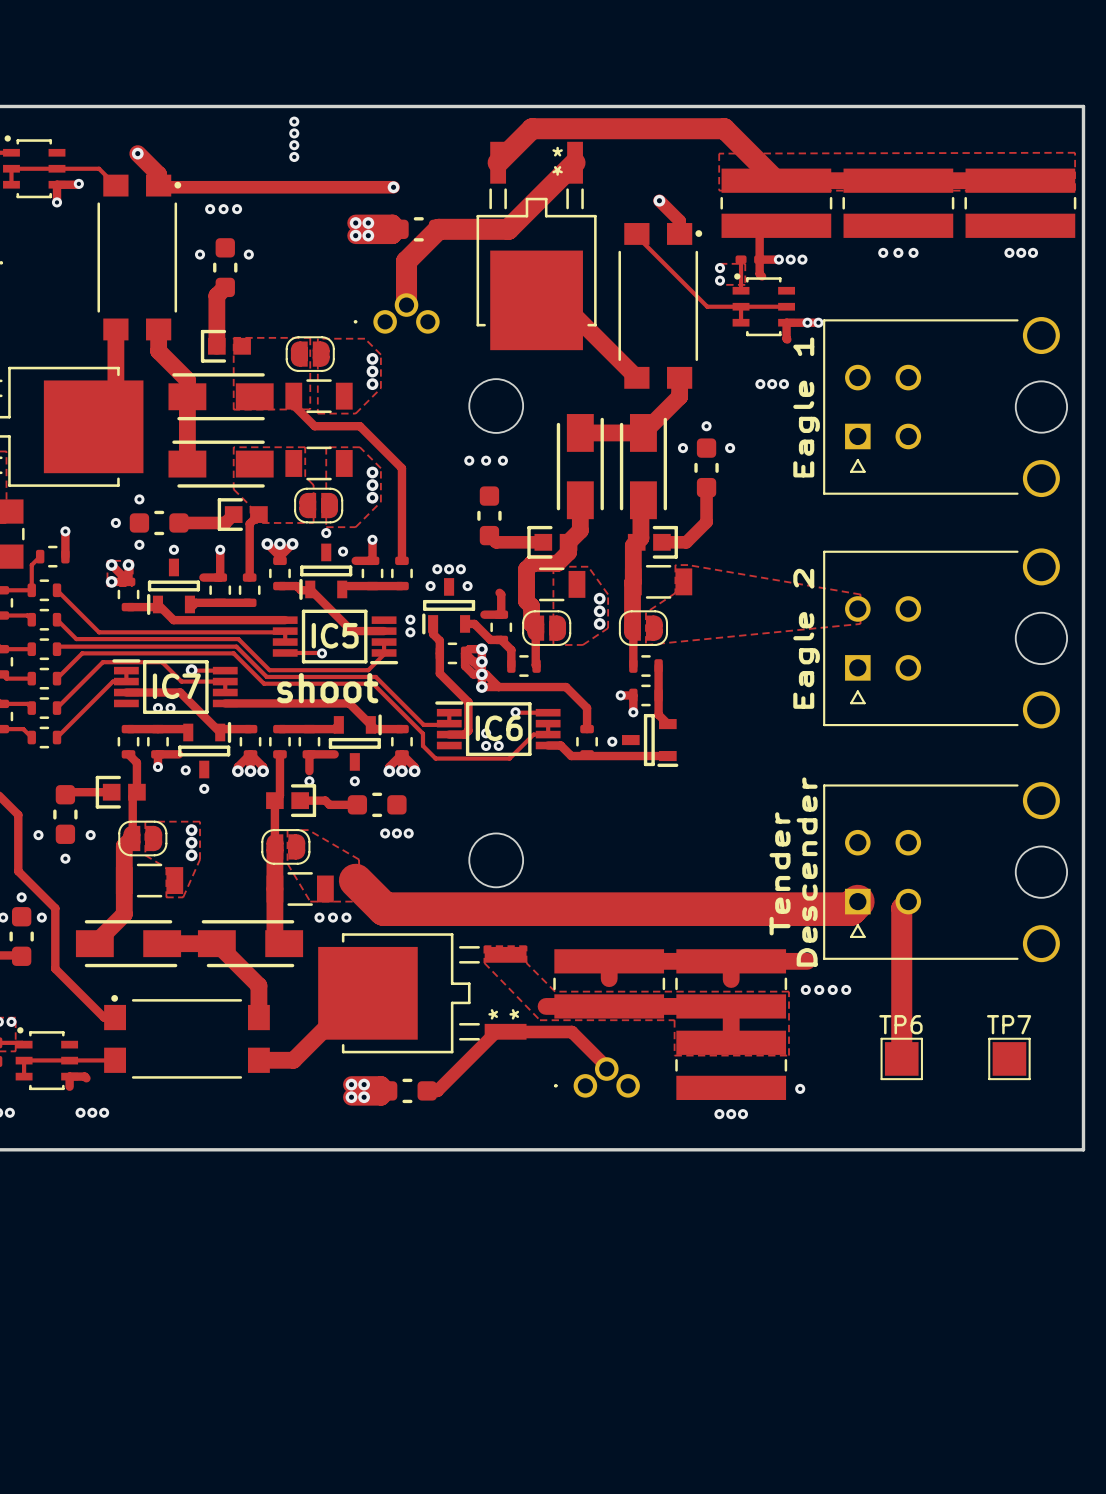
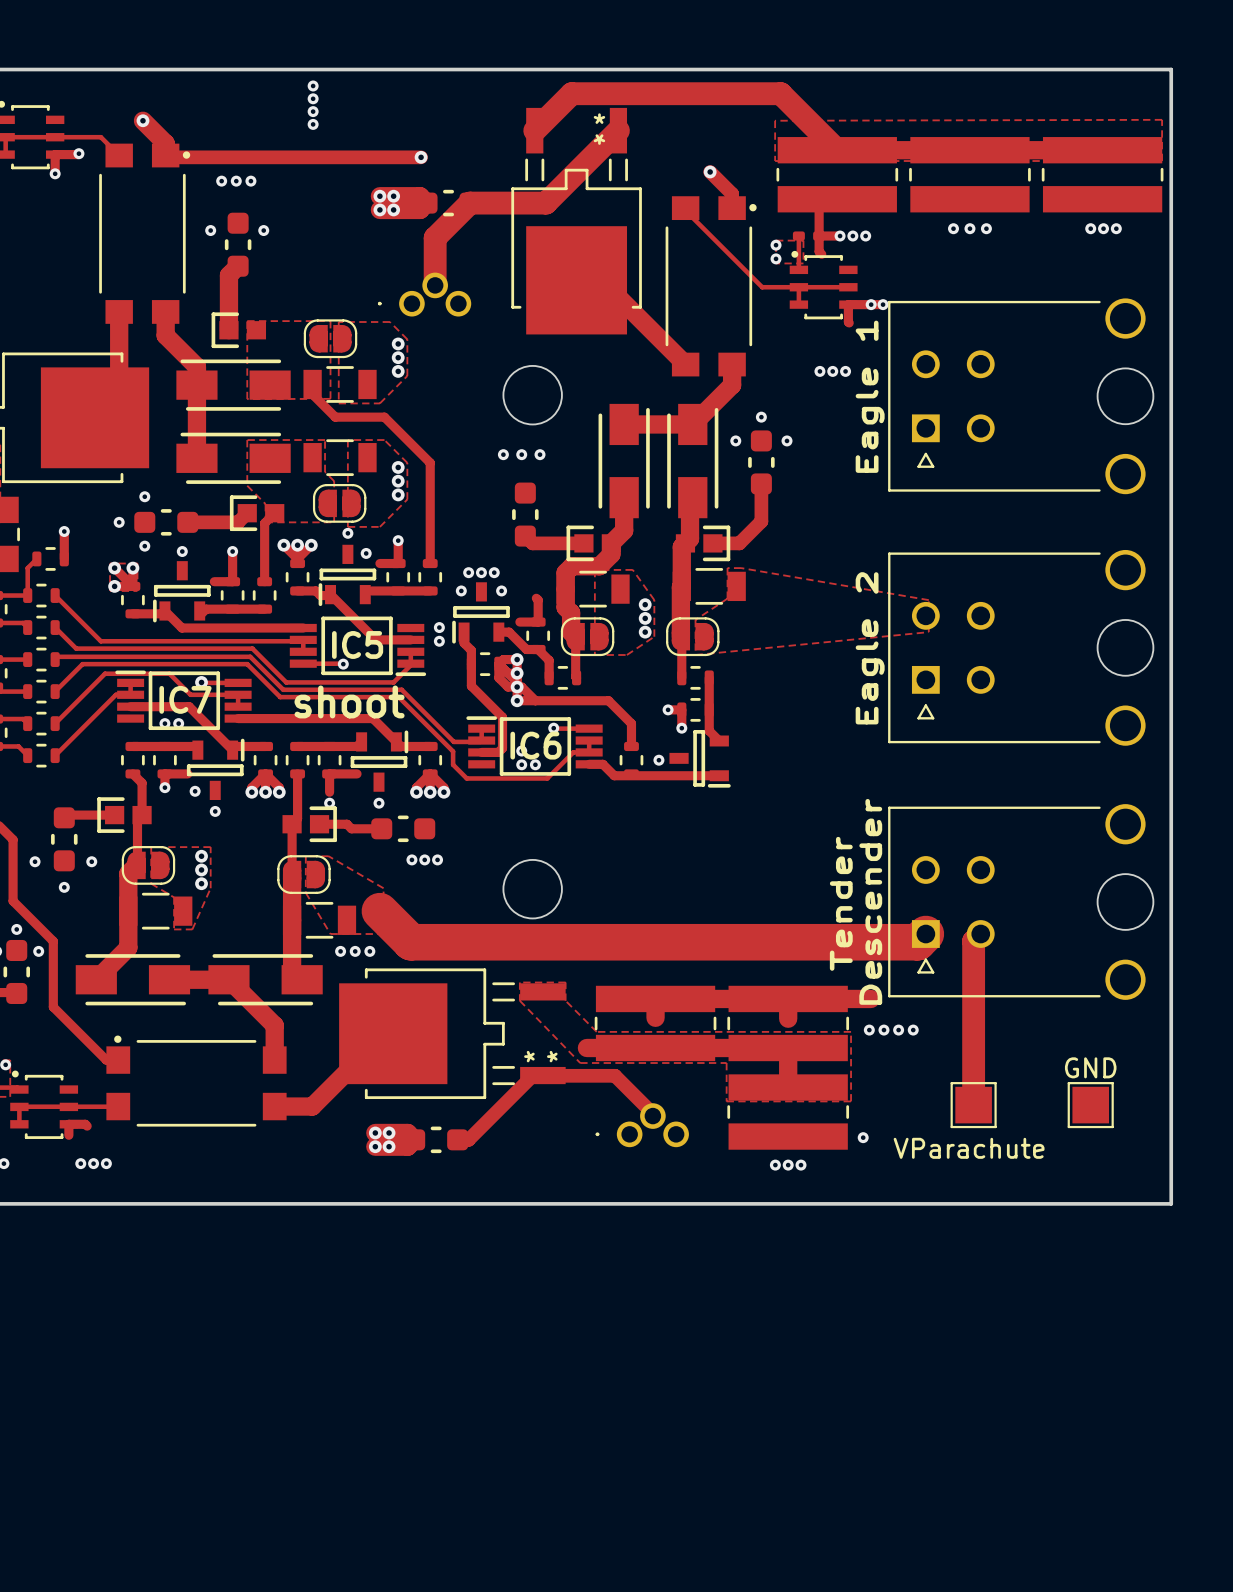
TP6 name: TP6 (900, 1024) -> VParachute (969, 1148)
TP7 name: TP7 (1009, 1024) -> GND (1090, 1067)

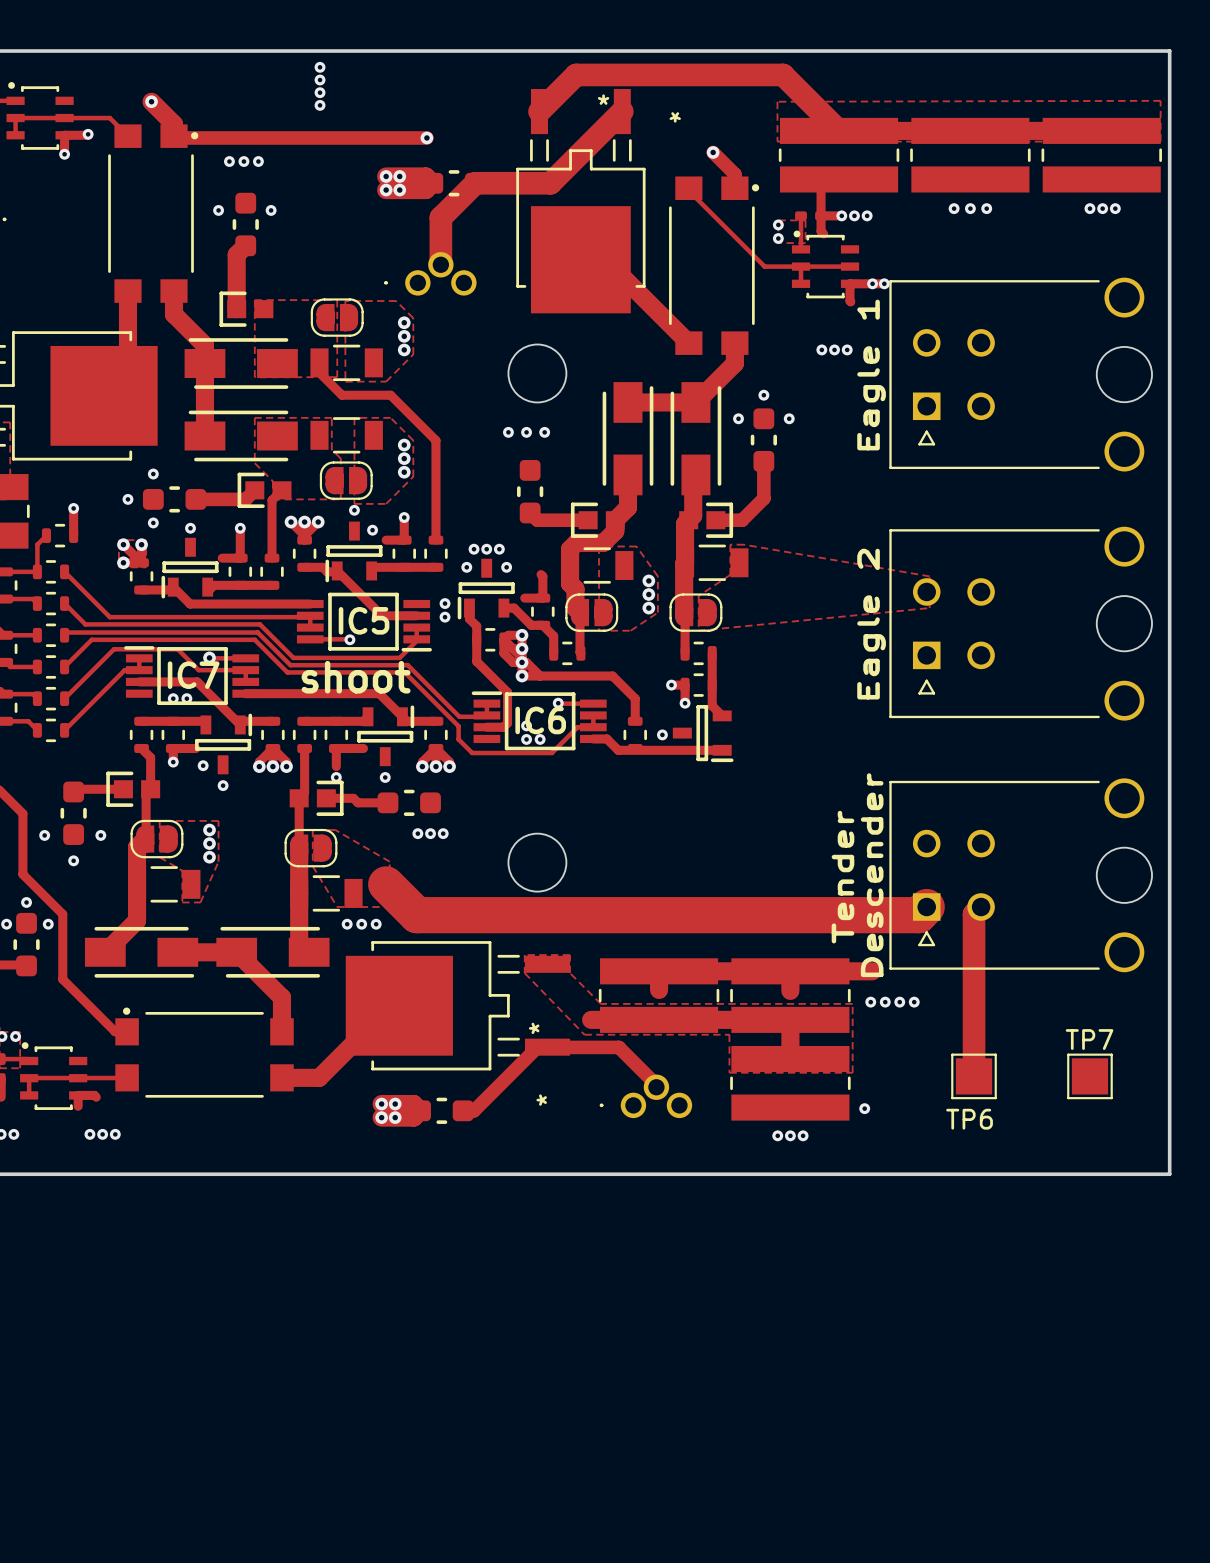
part text position: * (599, 139) -> * (675, 117)
part text position: * (552, 1056) -> * (541, 1100)
GND name: GND (1090, 1067) -> TP7 (1089, 1039)
VParachute name: VParachute (969, 1148) -> TP6 (969, 1119)

